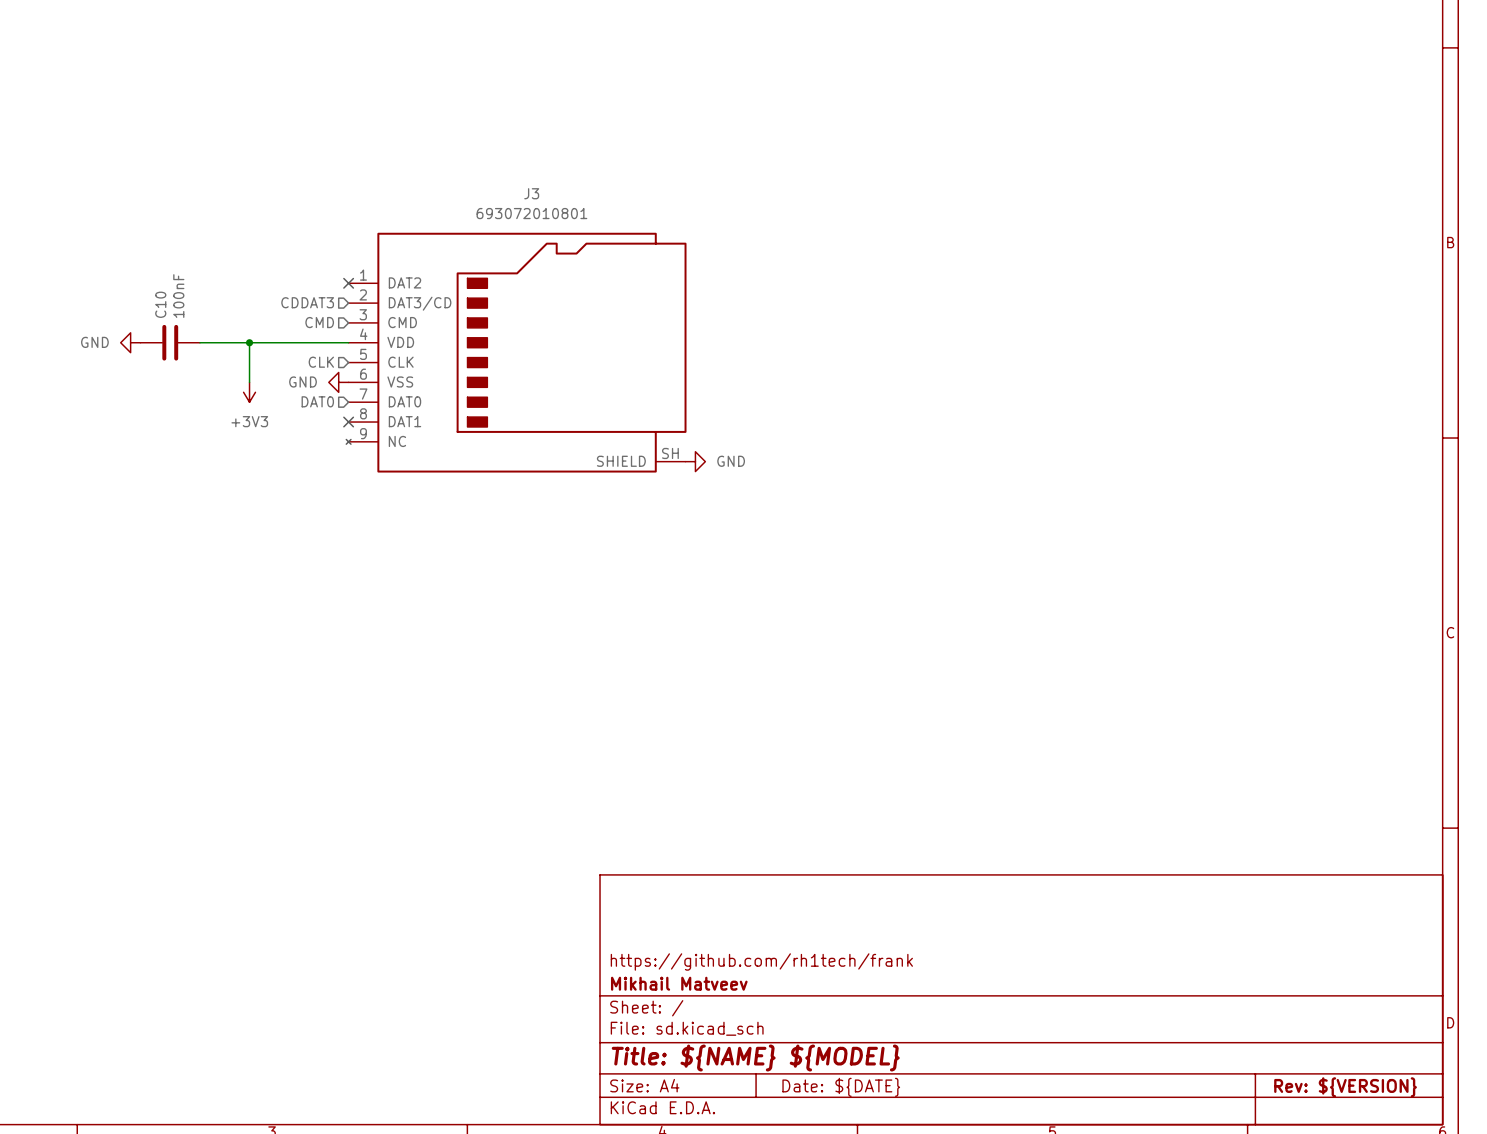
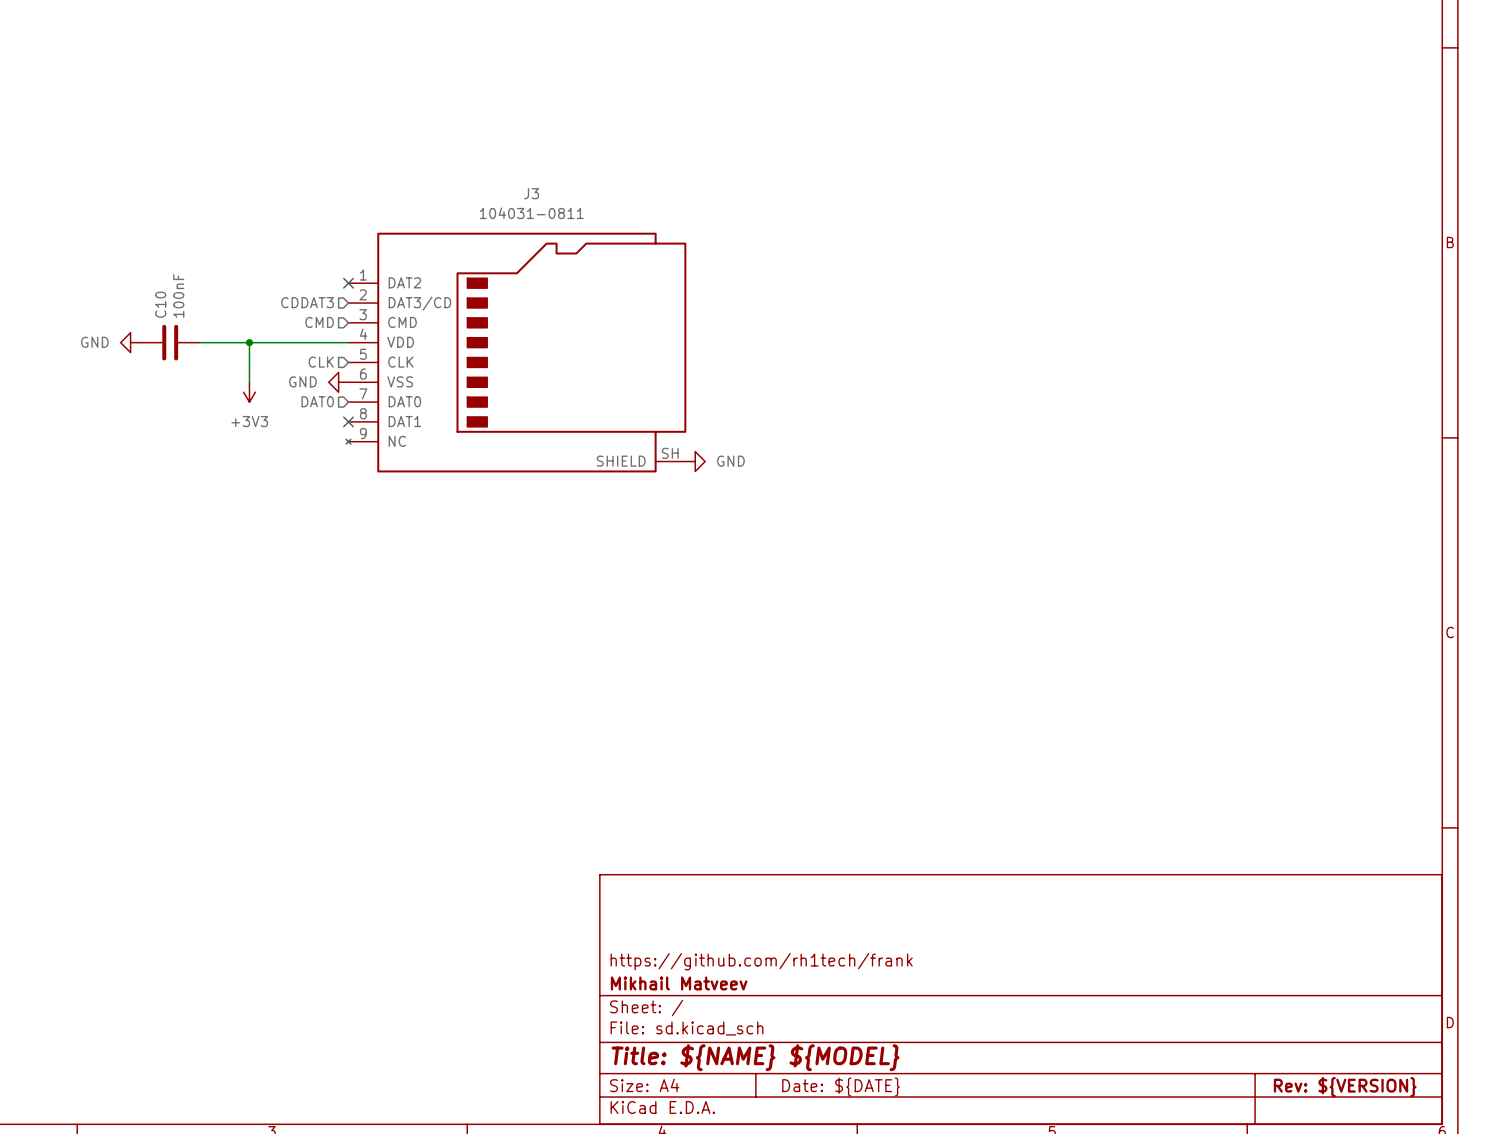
J3 value: 693072010801 (531, 213) -> 104031-0811 (531, 213)

